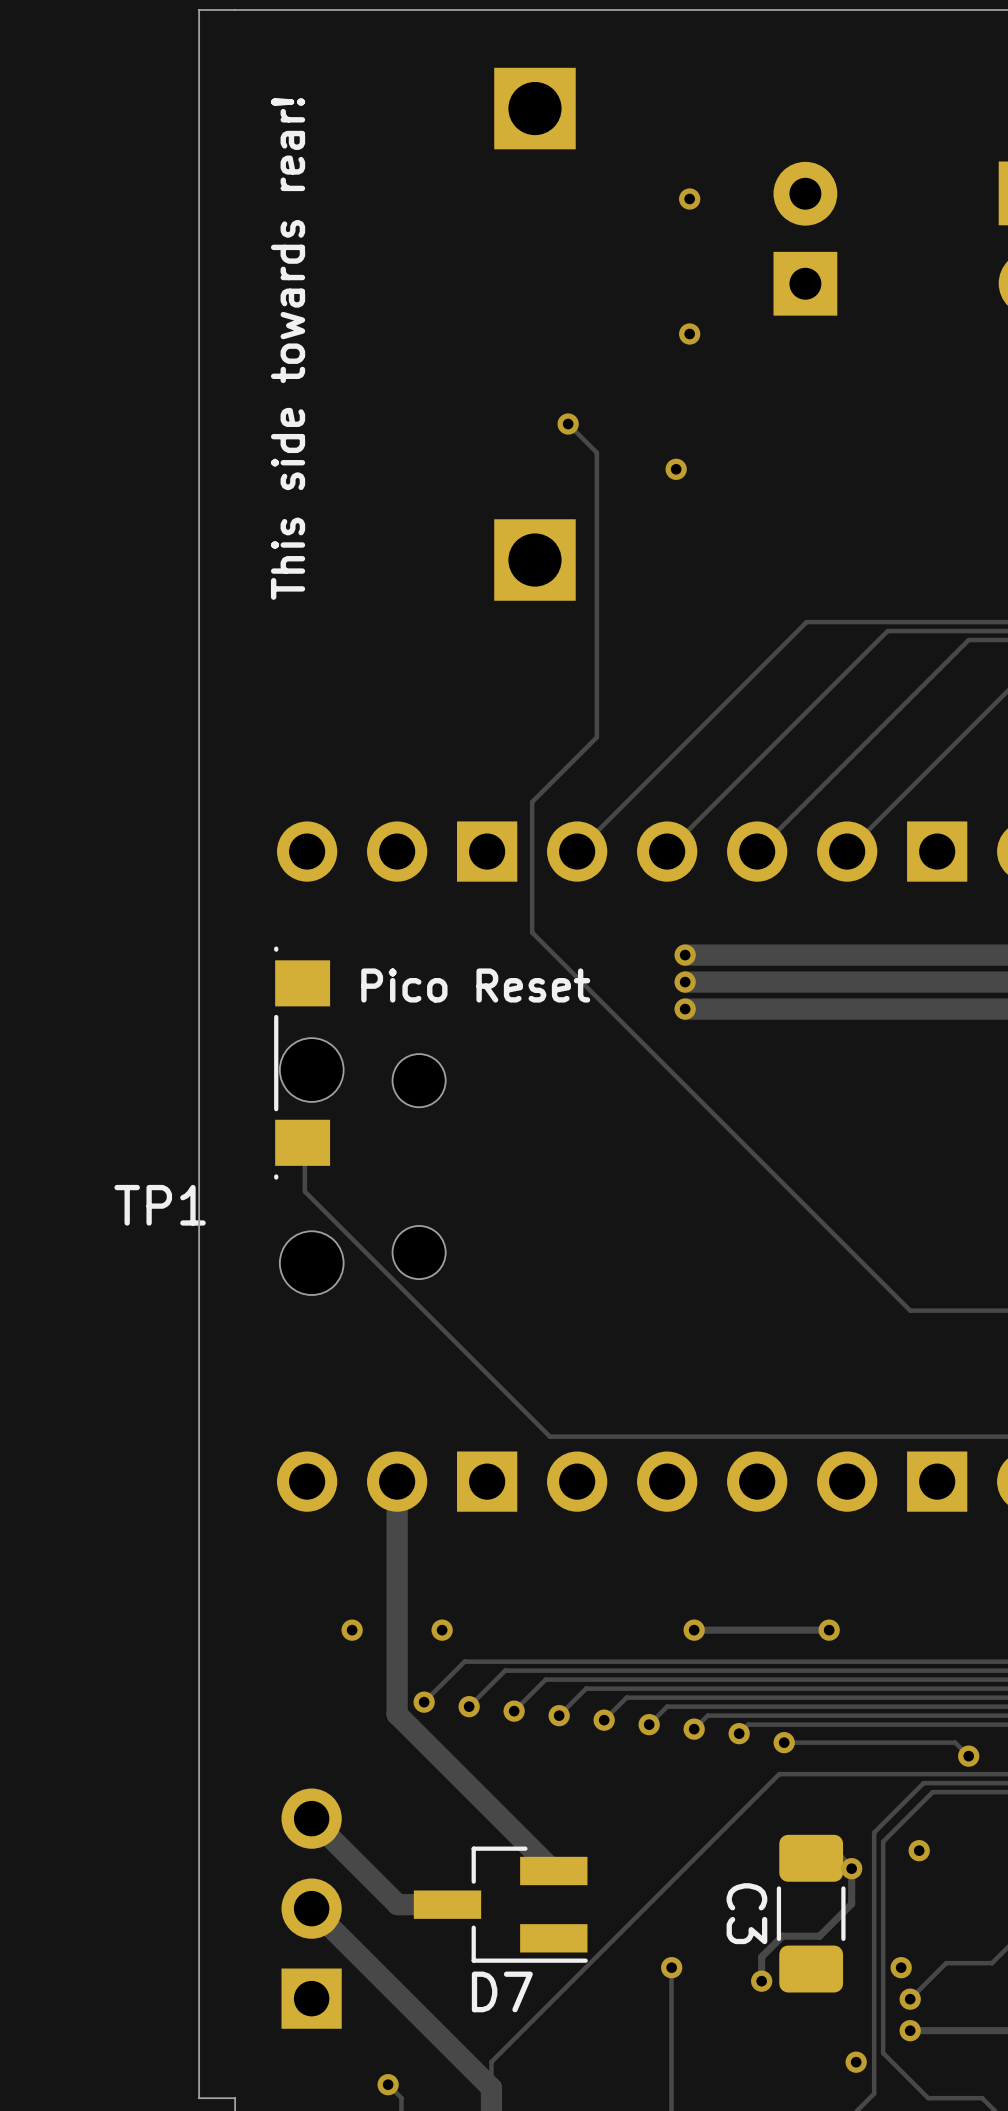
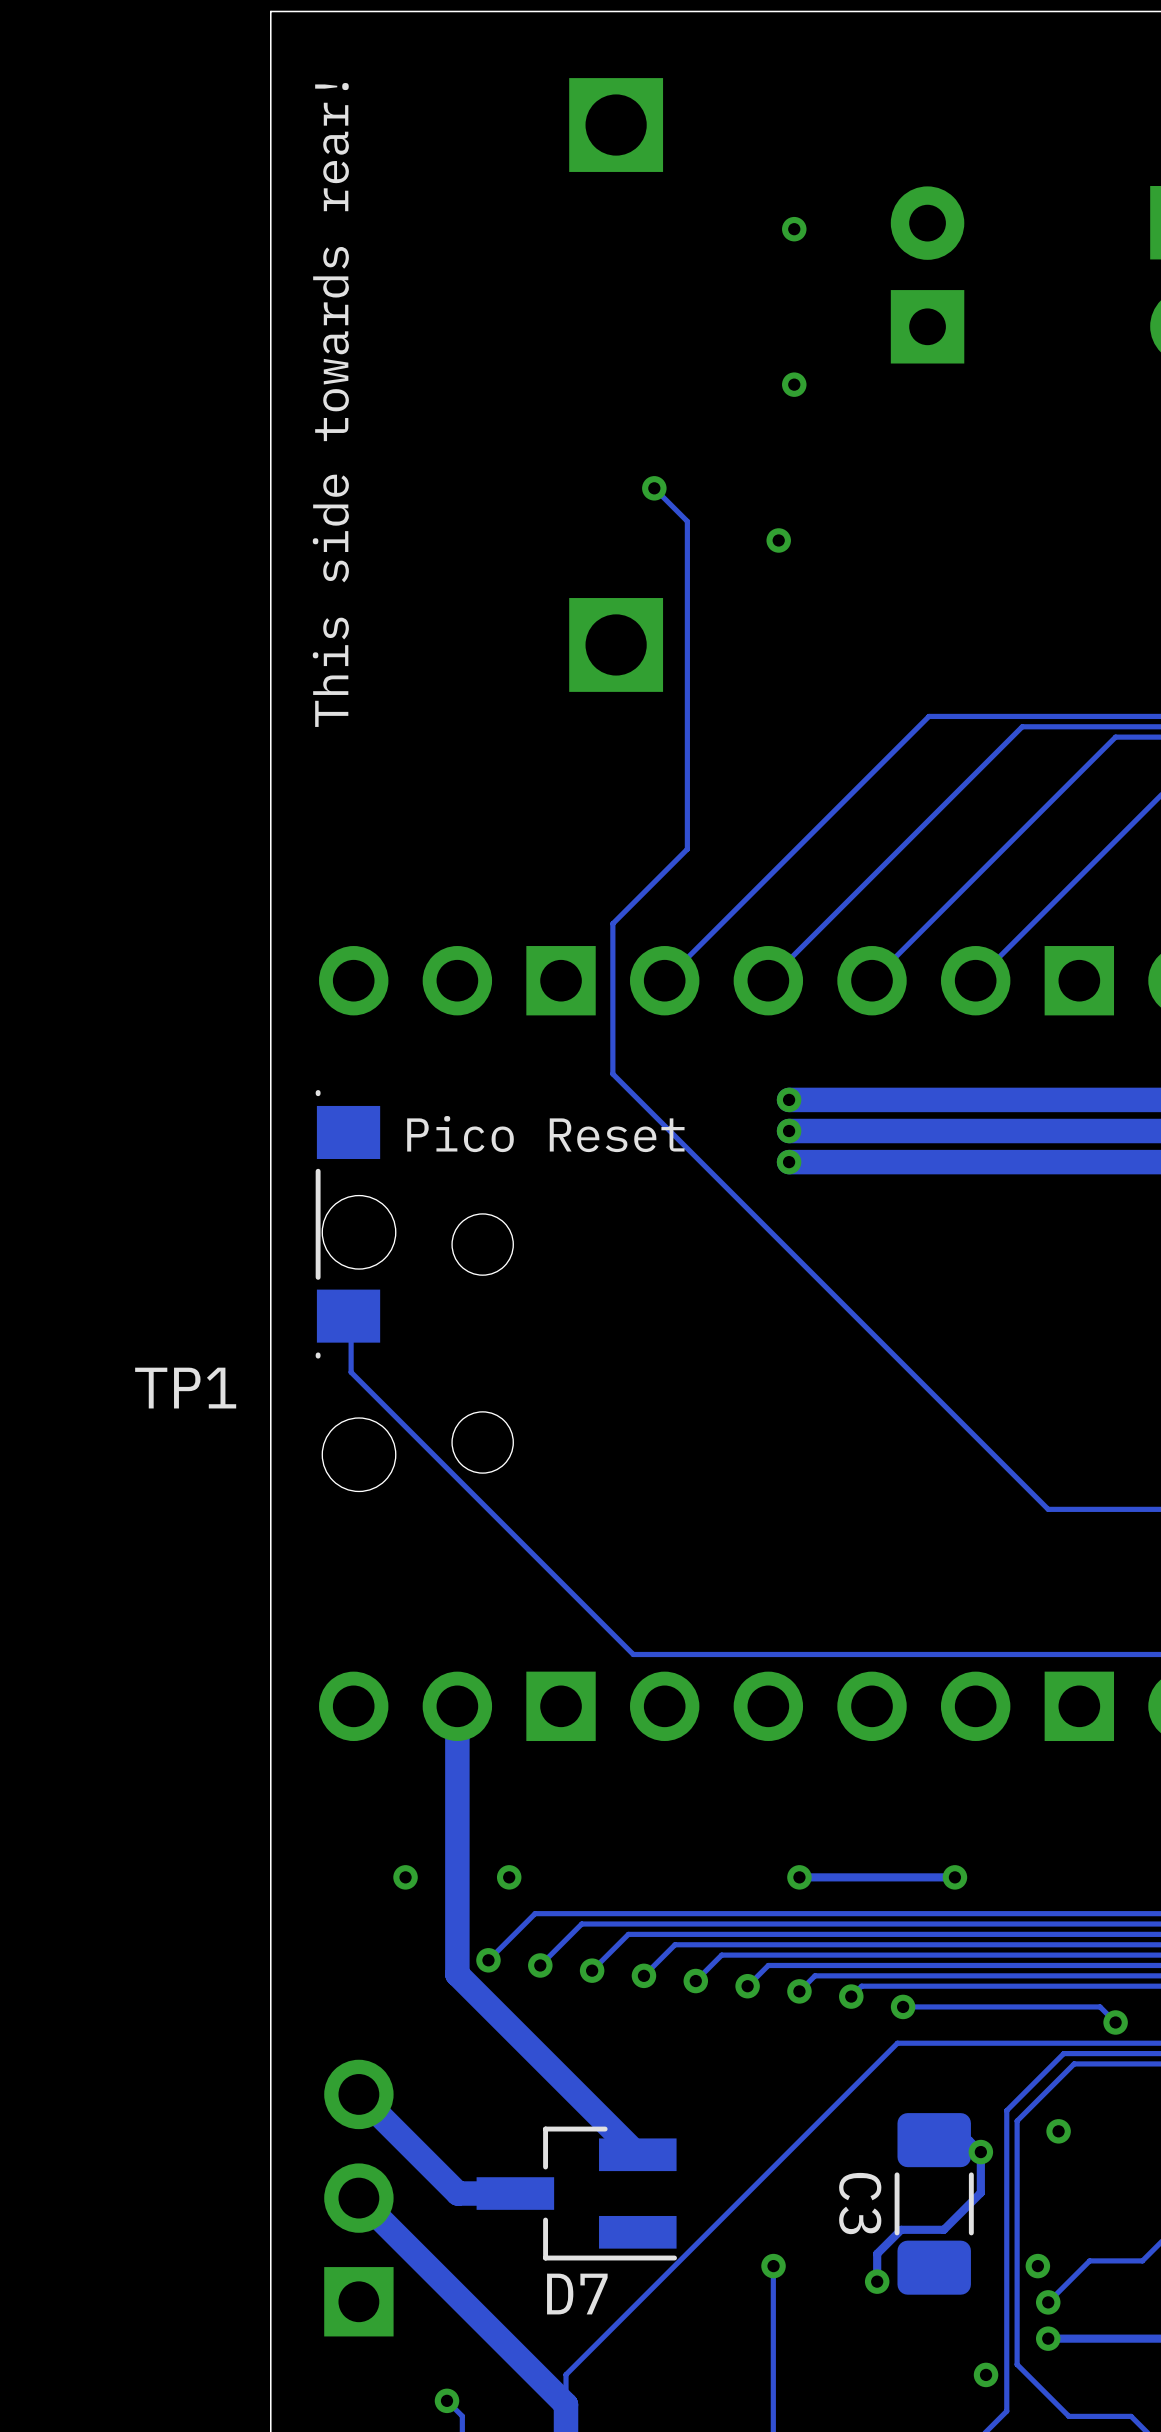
board edge: (235, 9) (199, 9) (199, 2098) (235, 2098) -> (270, 11) (270, 2416)

